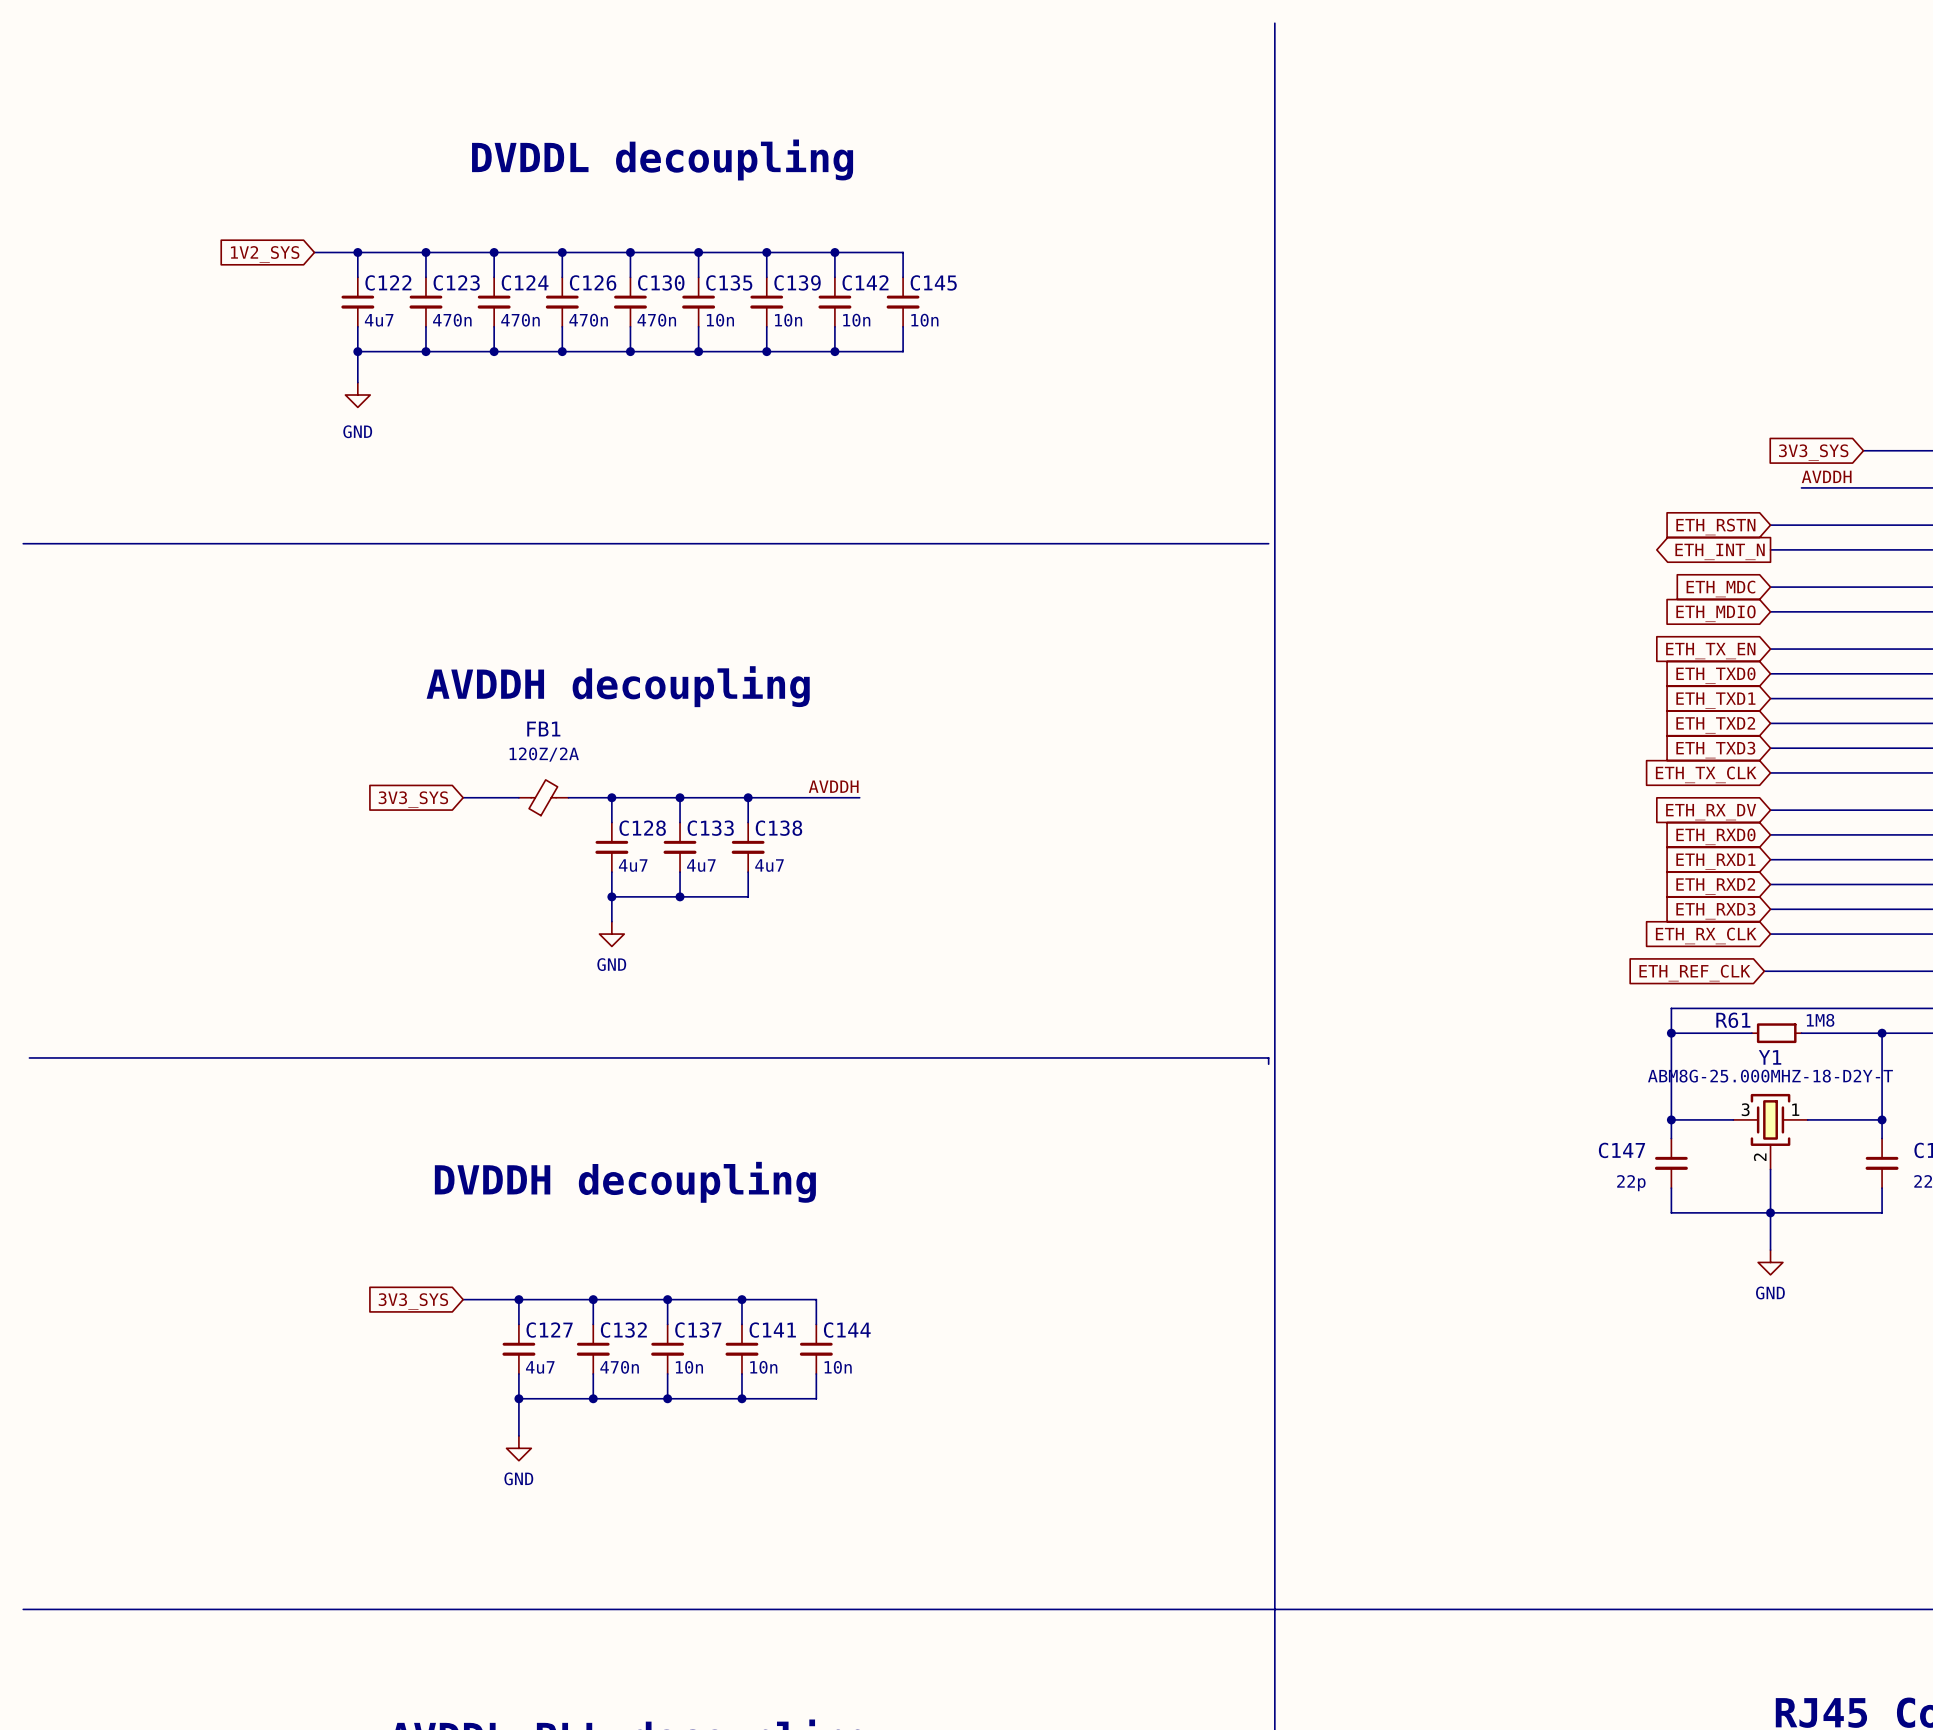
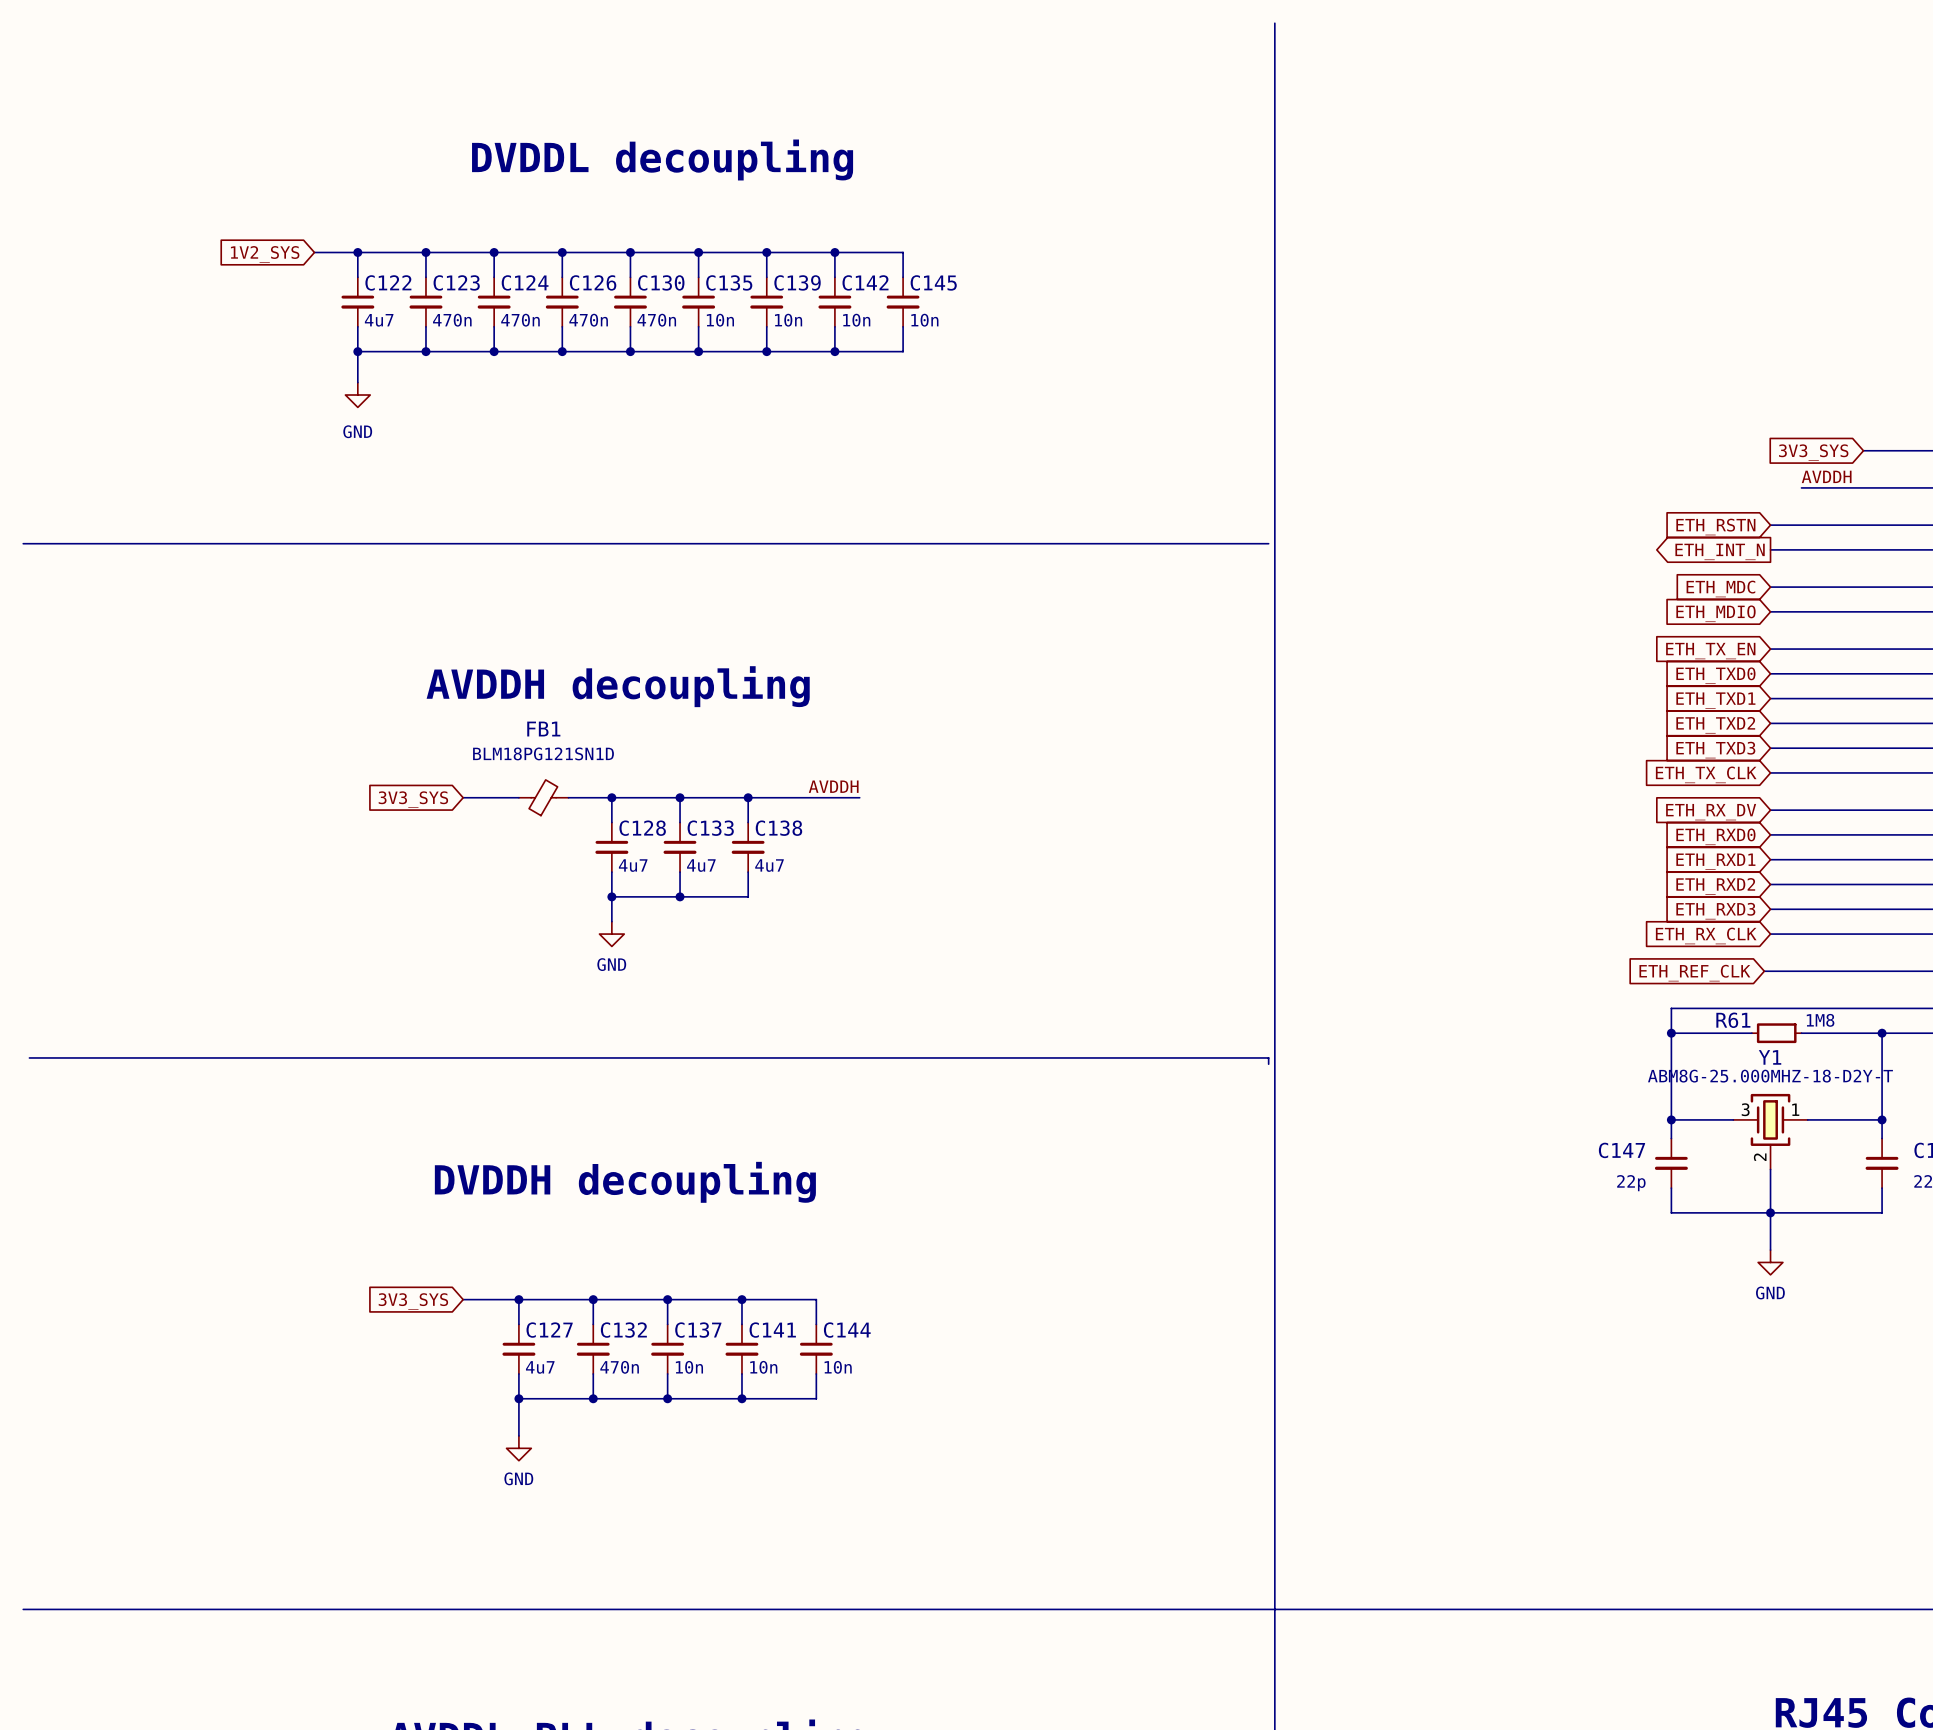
FB1 text: none -> BLM18PG121SN1D (543, 753)
FB1 text: 120Z/2A (544, 754) -> none

